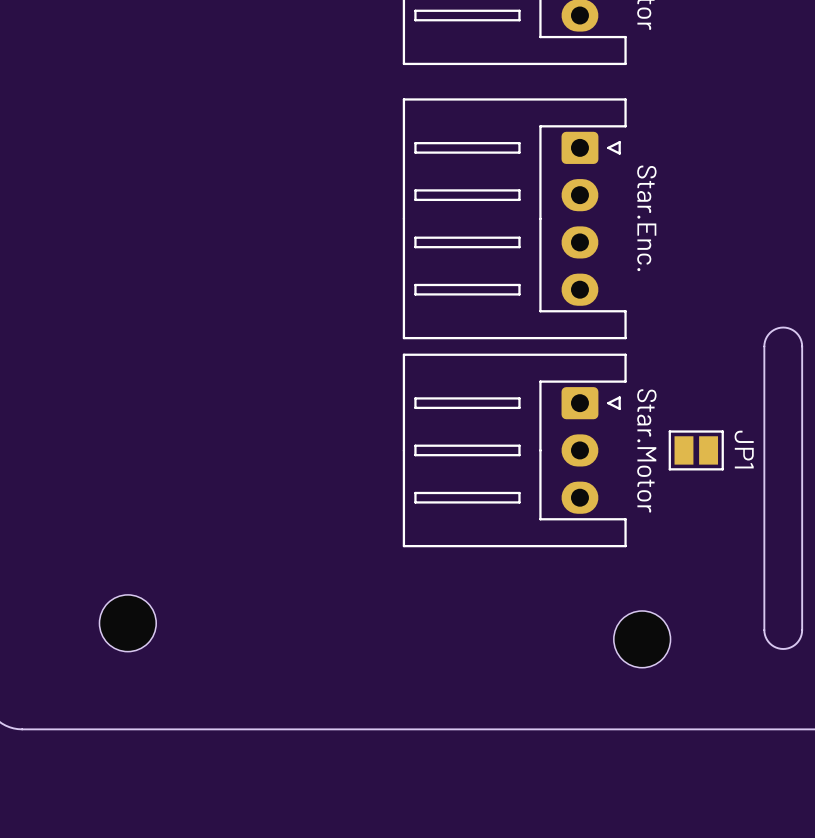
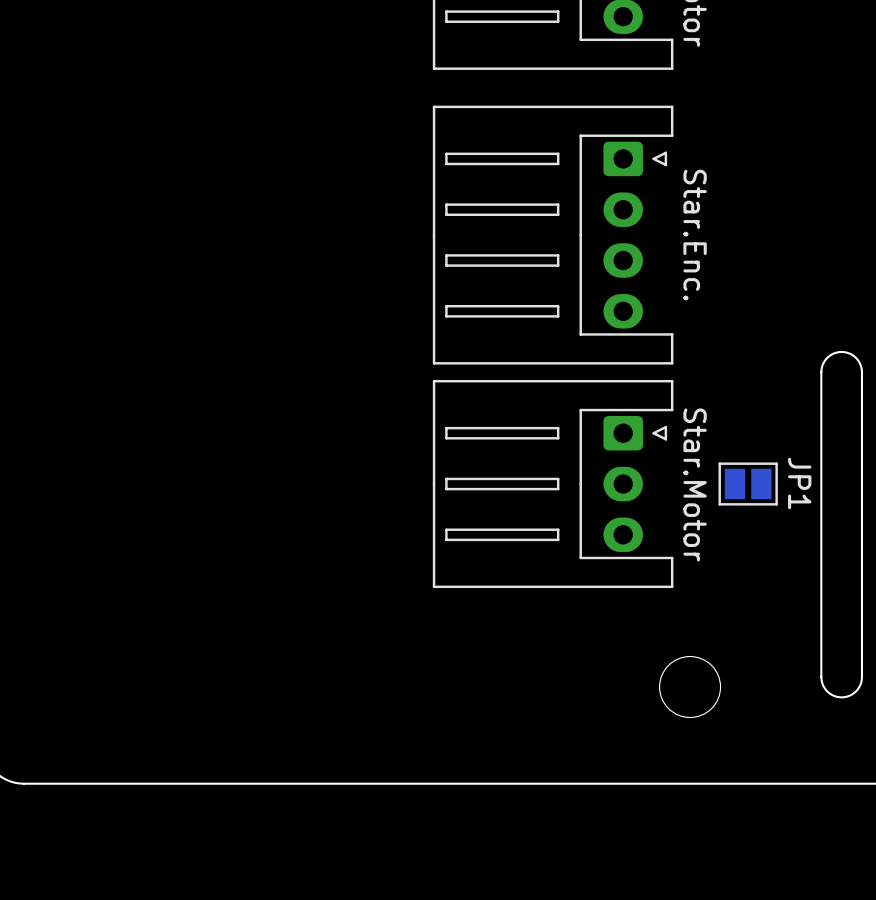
part: (127, 623) -> none

